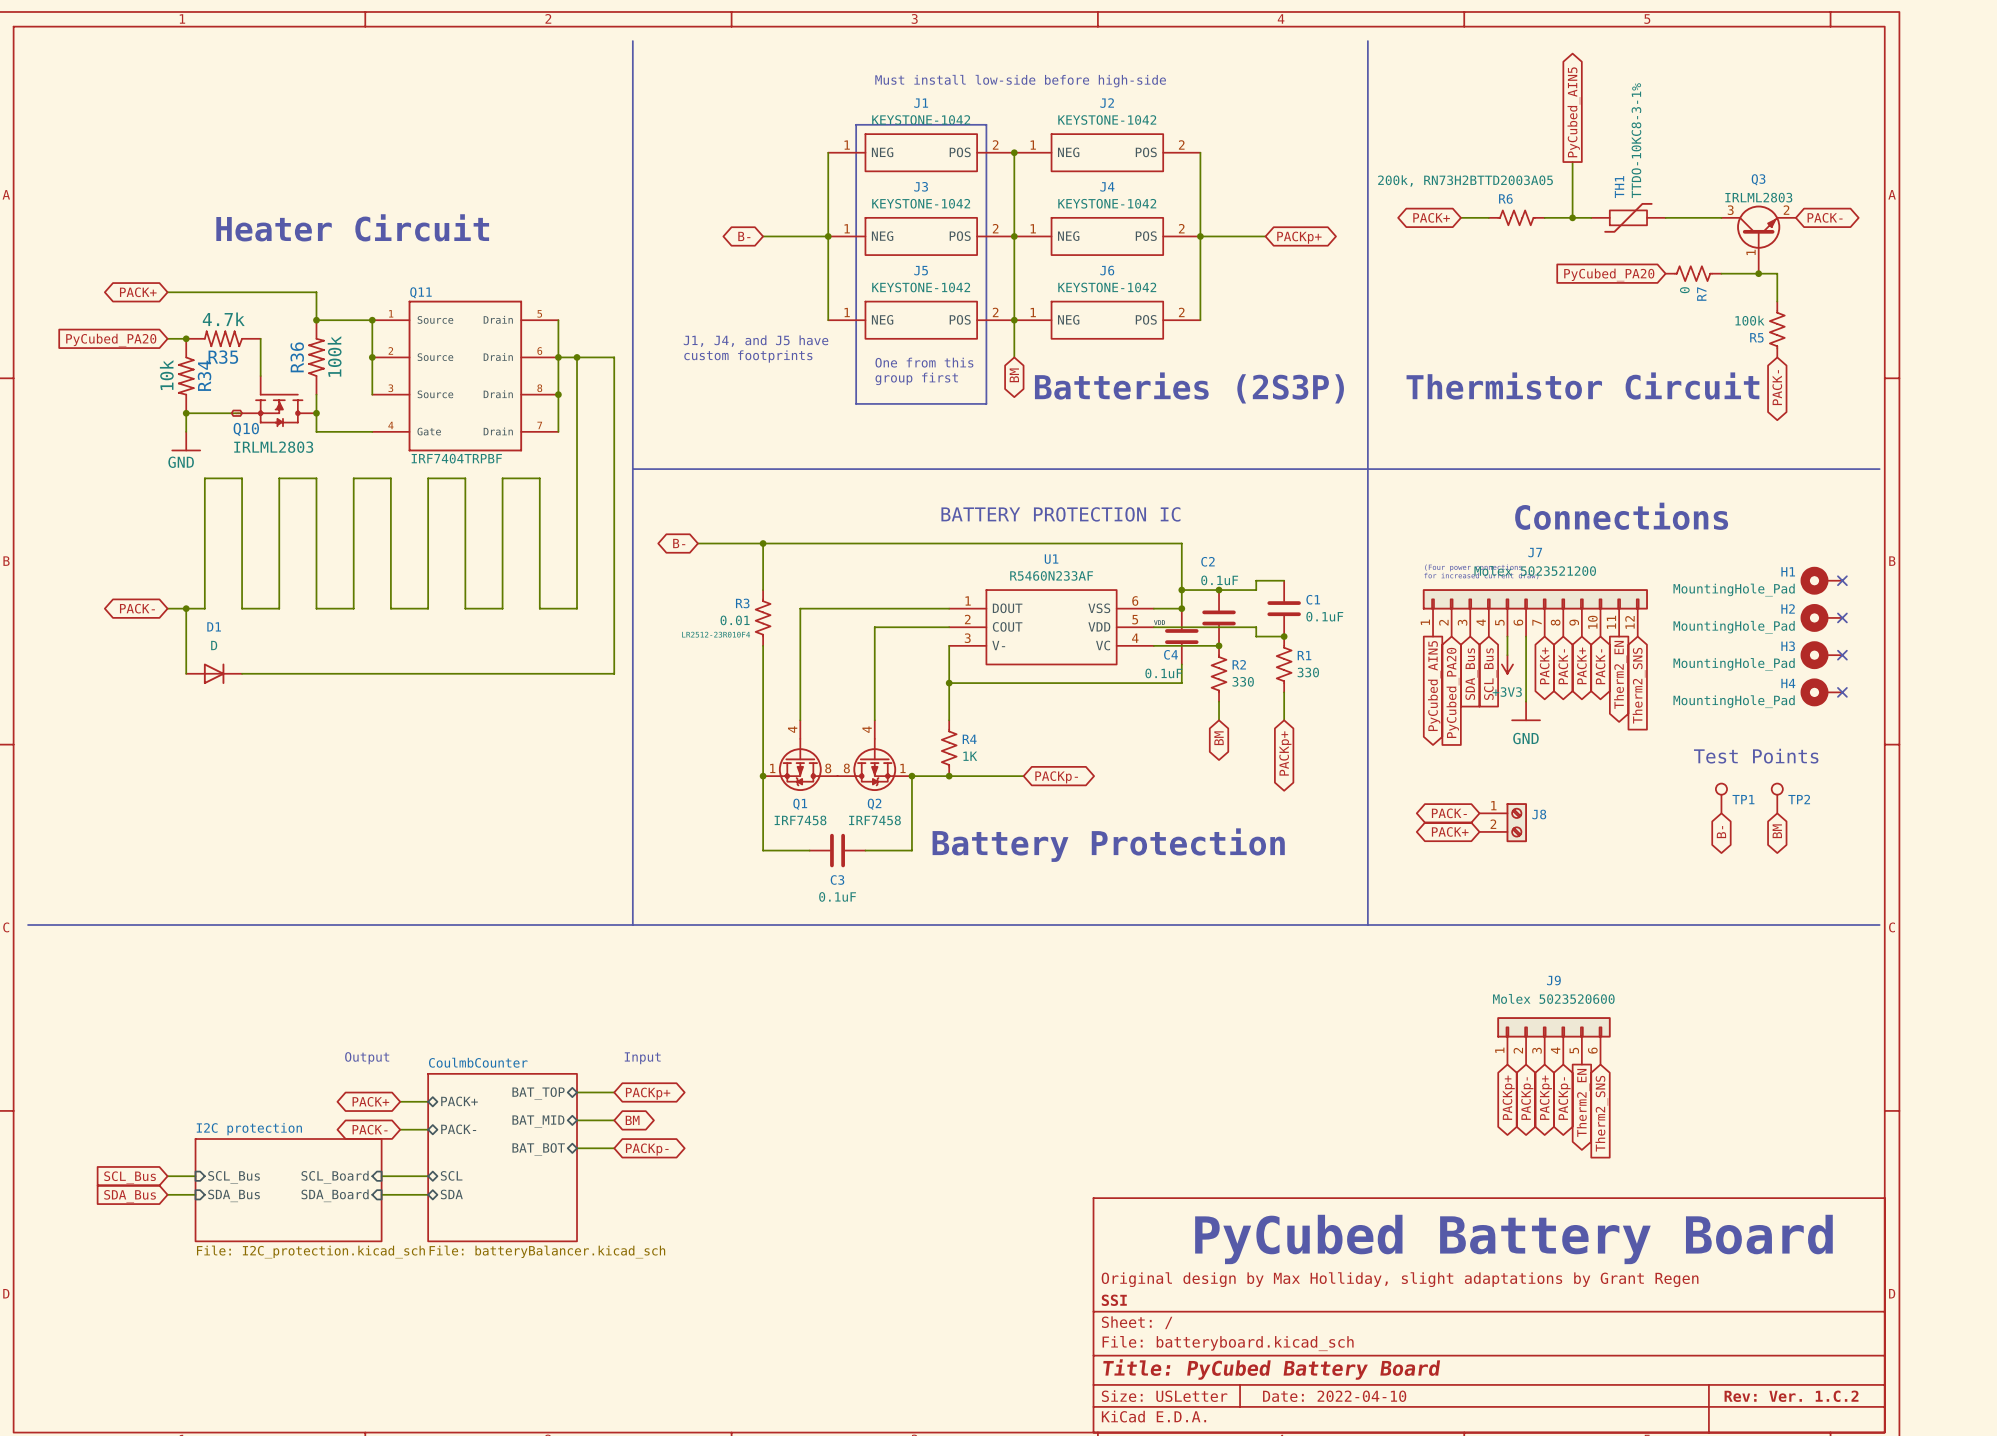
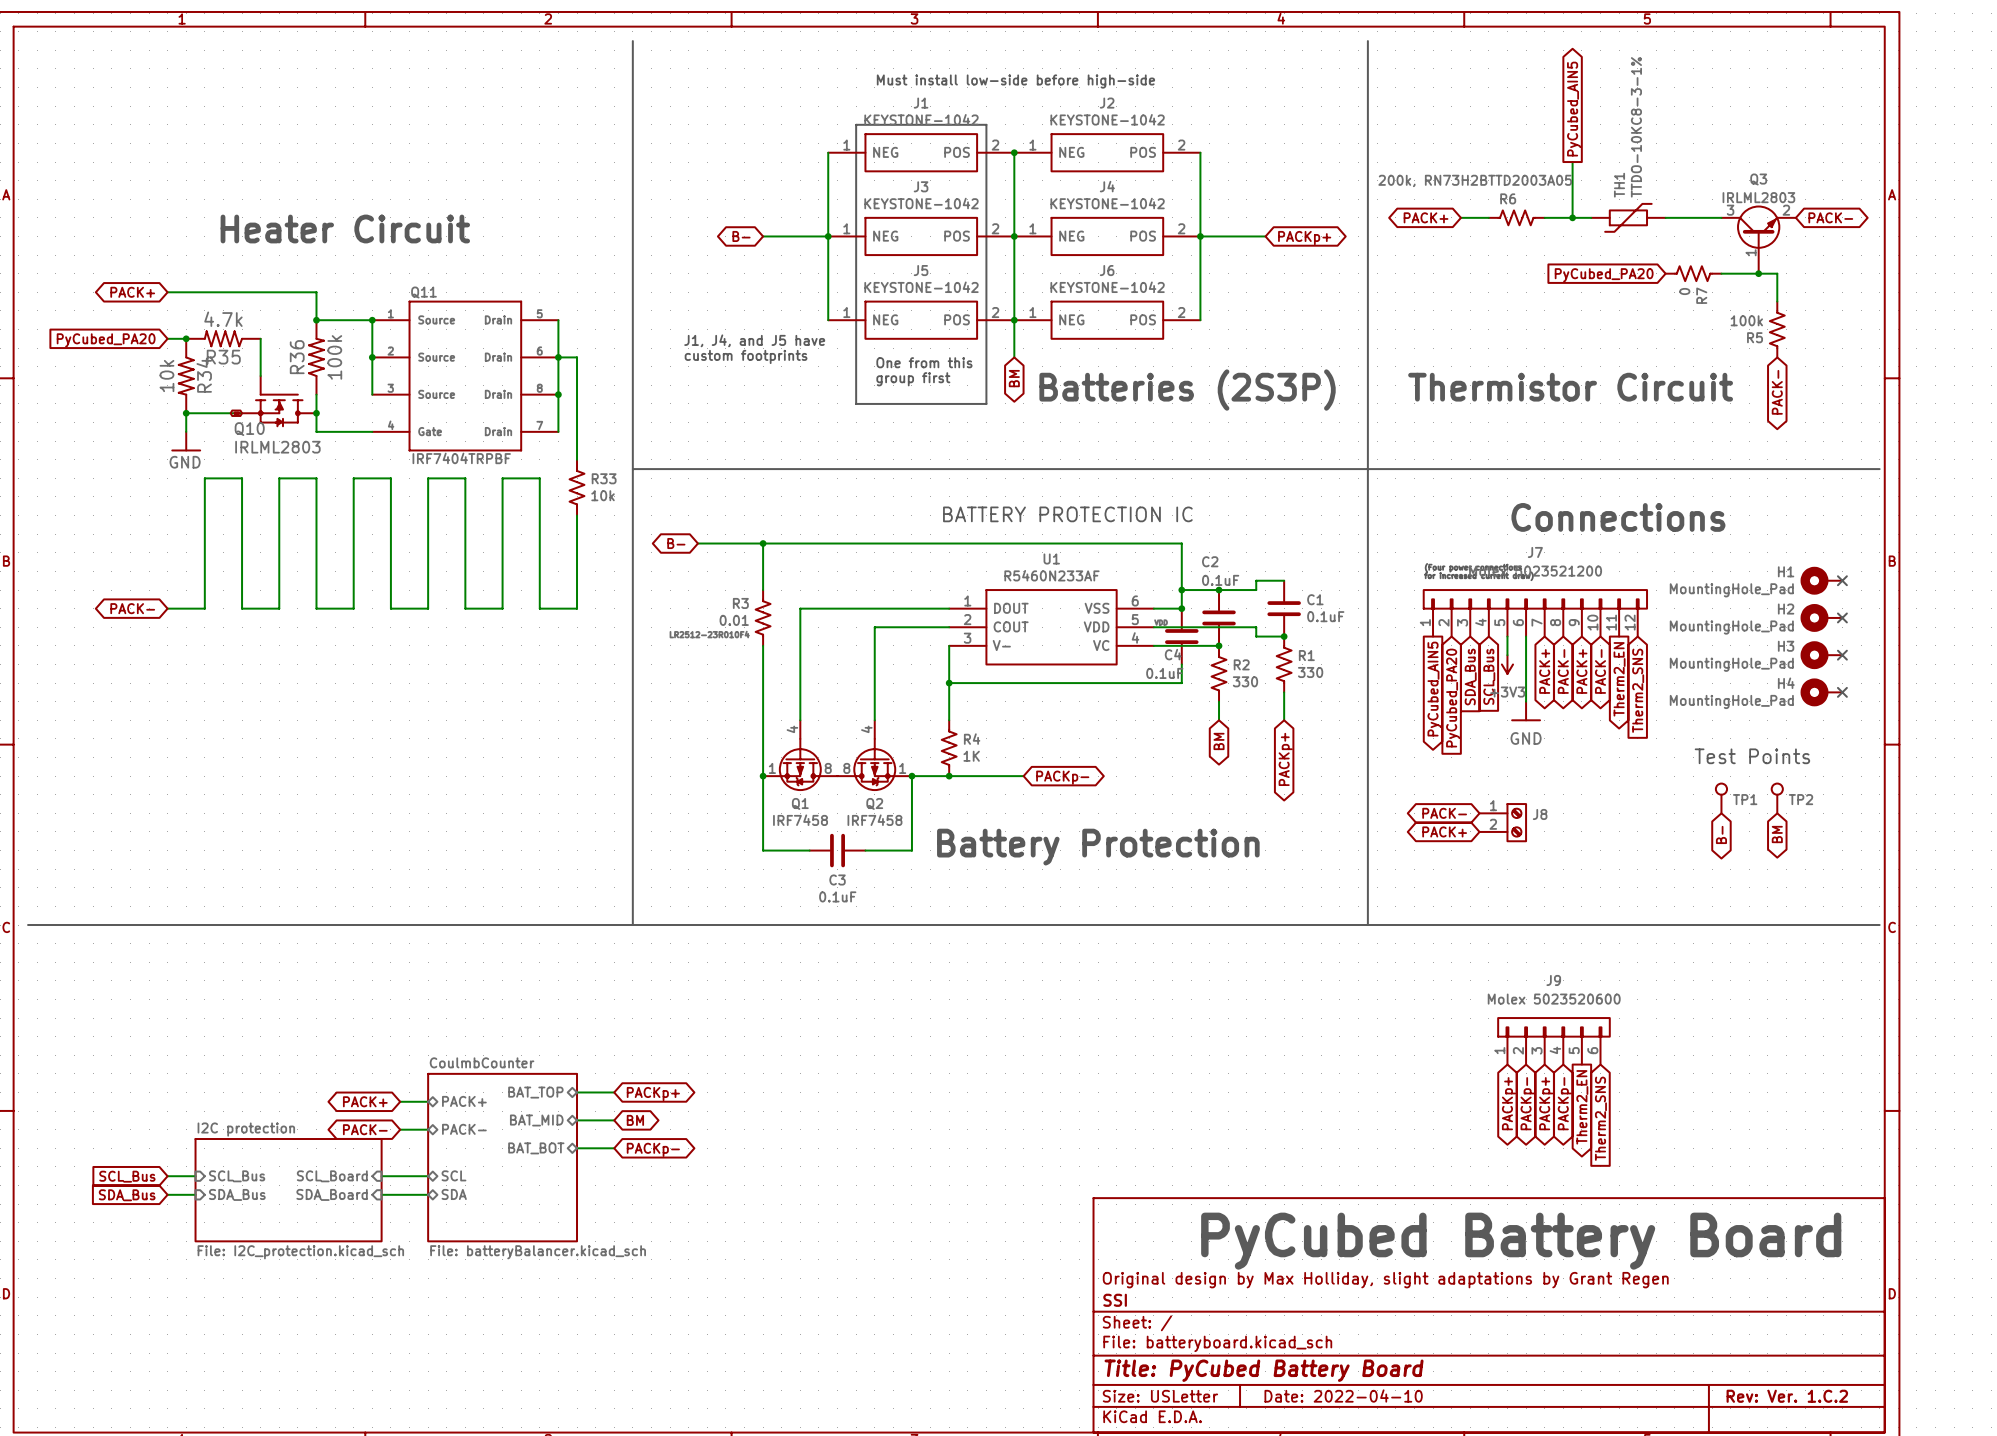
wire: (577, 357) (614, 357) (614, 673) (242, 673) -> none
junction: (577, 357) -> none
R33: none -> 10k (577, 487)
wire: (186, 608) (186, 673) -> none
junction: (186, 608) -> none
D1: D (214, 673) -> none
text: Output (367, 1058) -> none
text: Input (642, 1058) -> none

